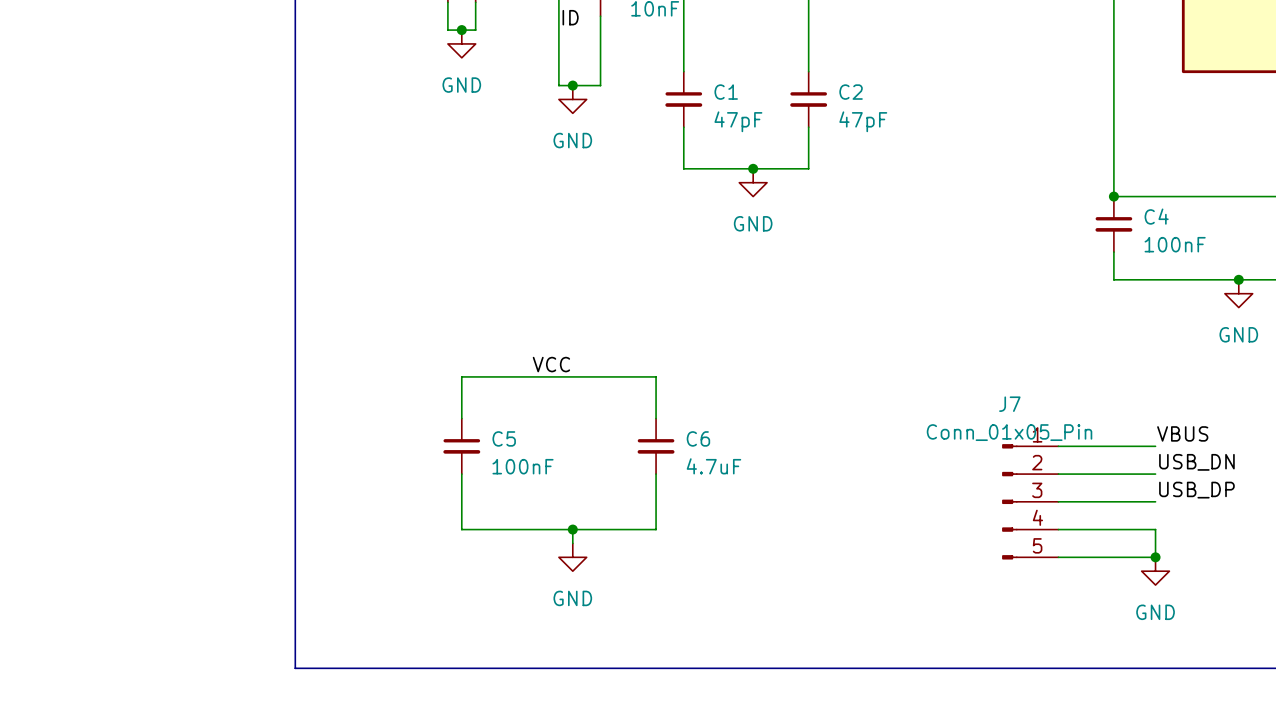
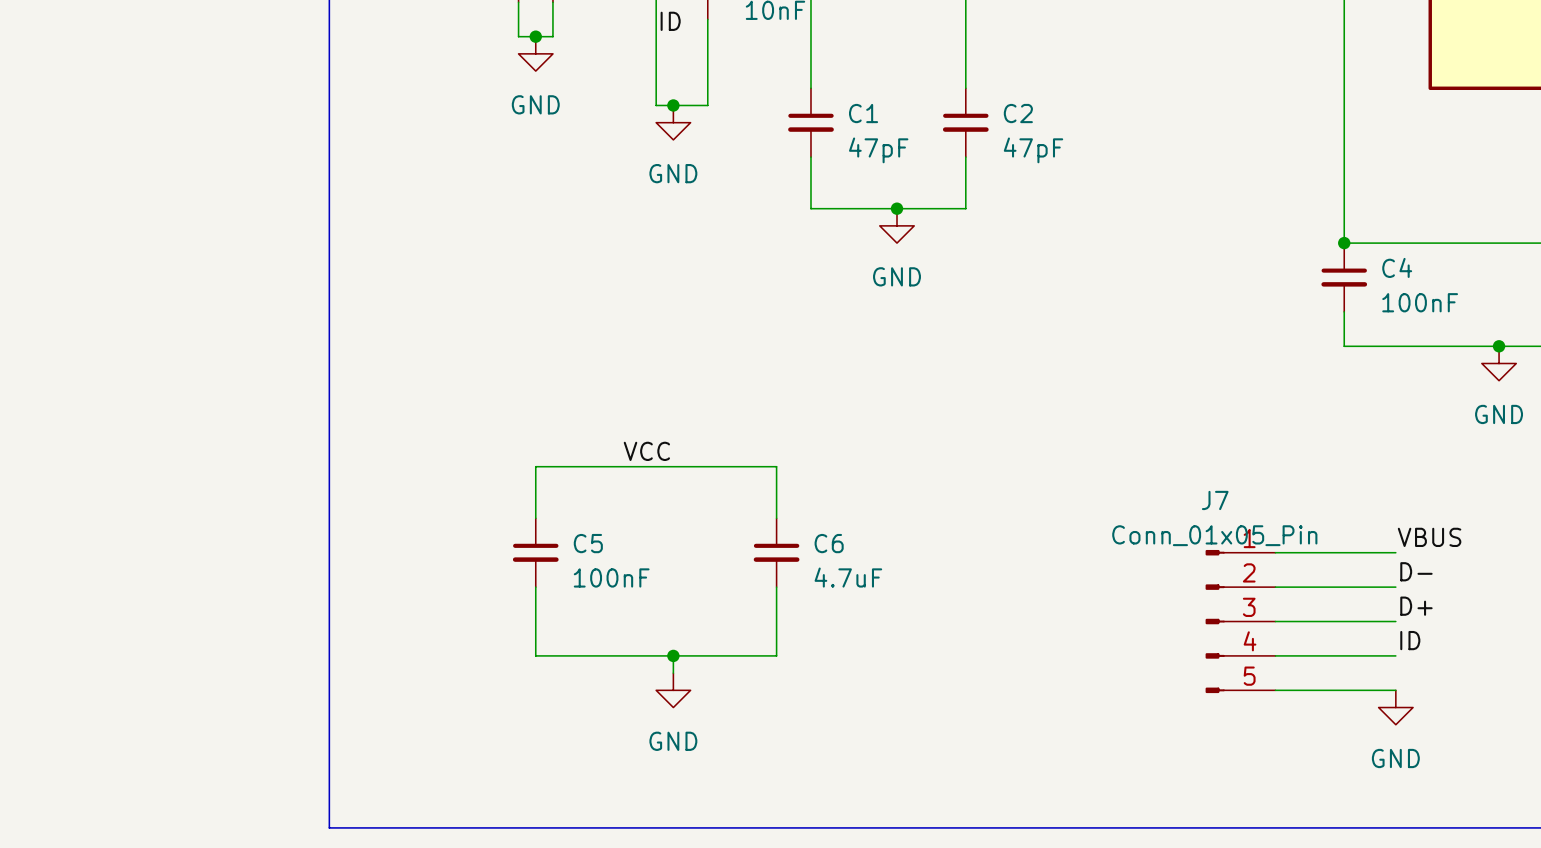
label: USB_DN (1196, 462) -> D- (1416, 571)
label: USB_DP (1196, 490) -> D+ (1416, 606)
label: none -> ID (1410, 640)
wire: (1155, 529) (1155, 557) -> none
junction: (1155, 557) -> none

